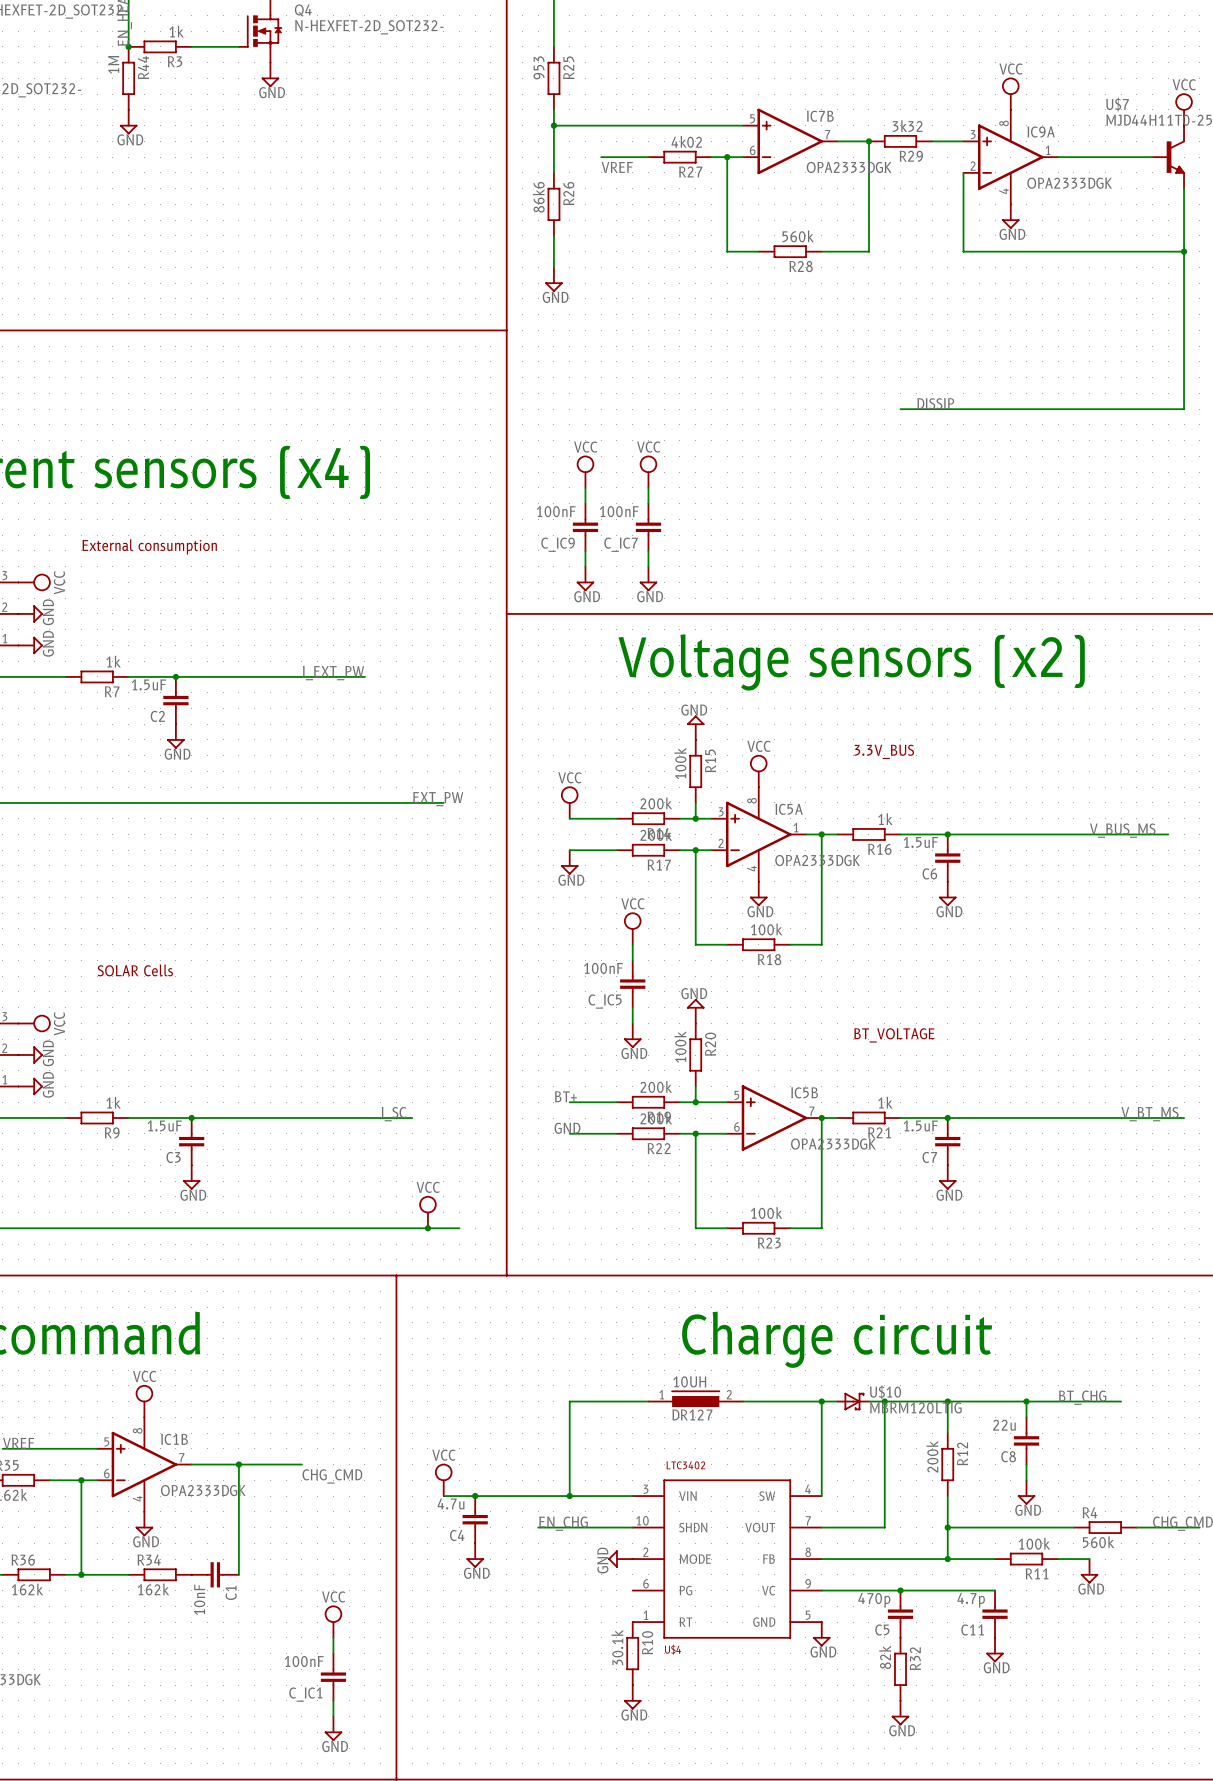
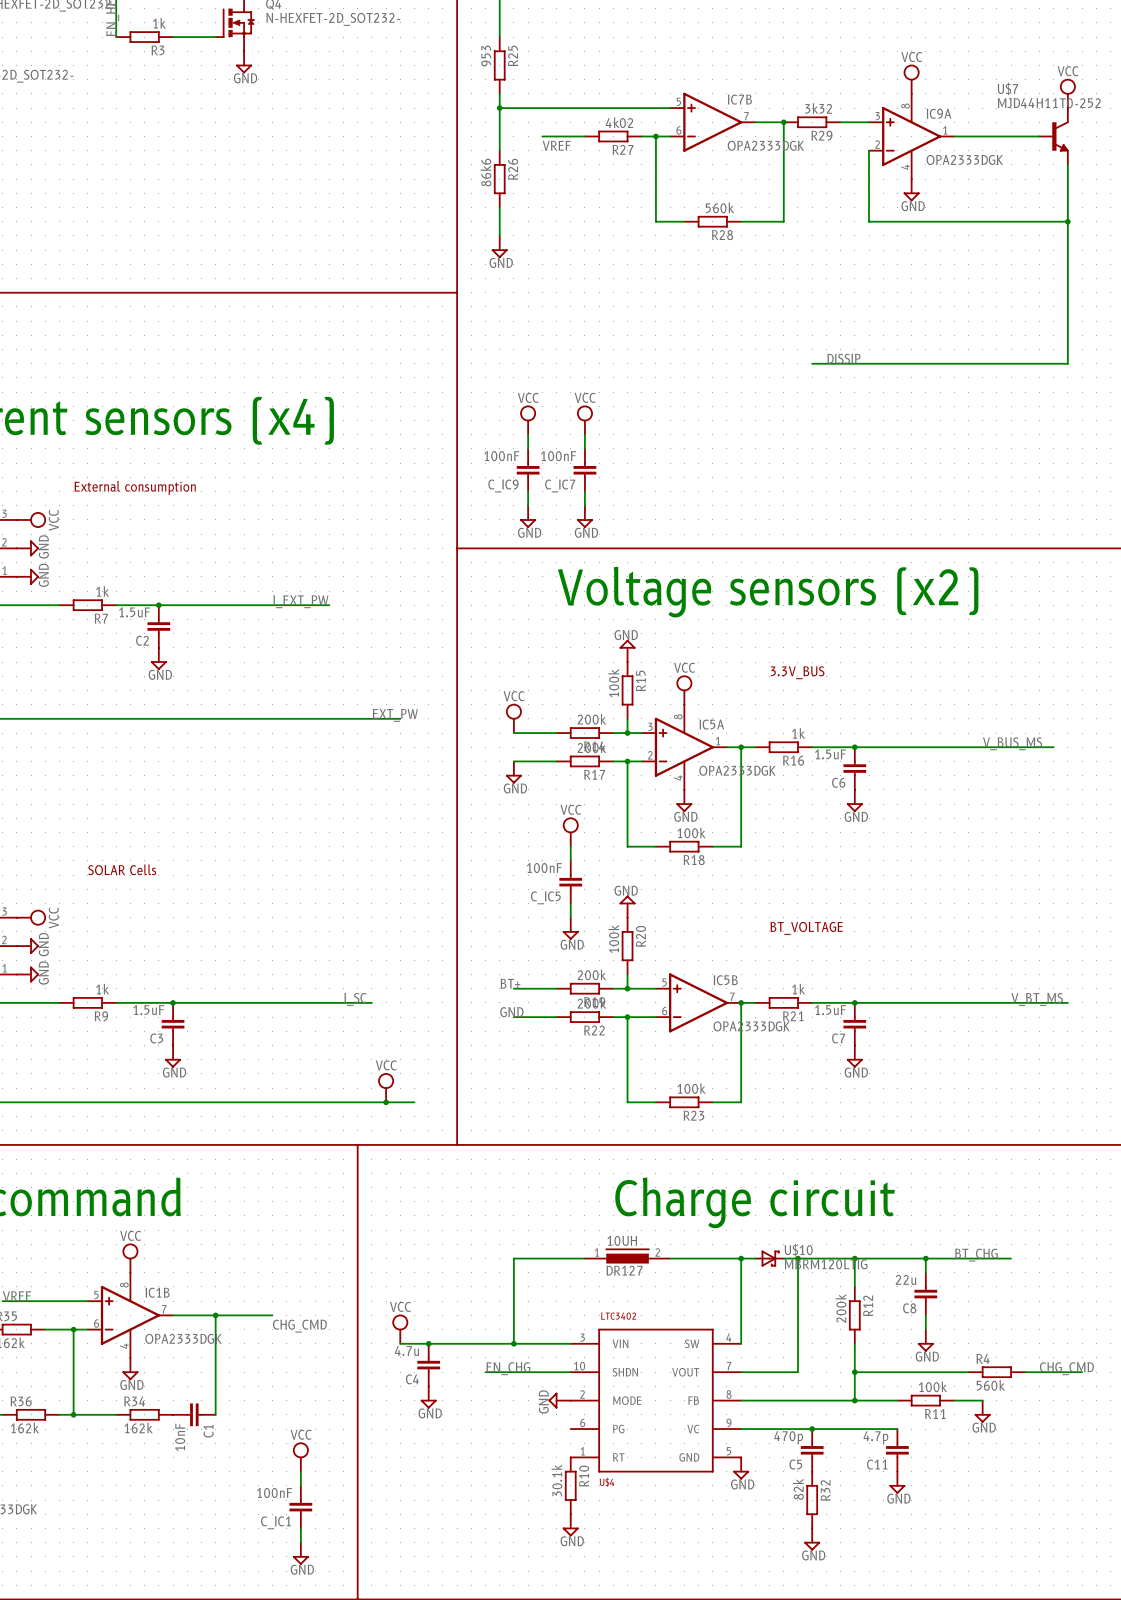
junction: (128, 46) -> none
R44: 1M (128, 78) -> none
power symbol: GND (128, 122) -> none

